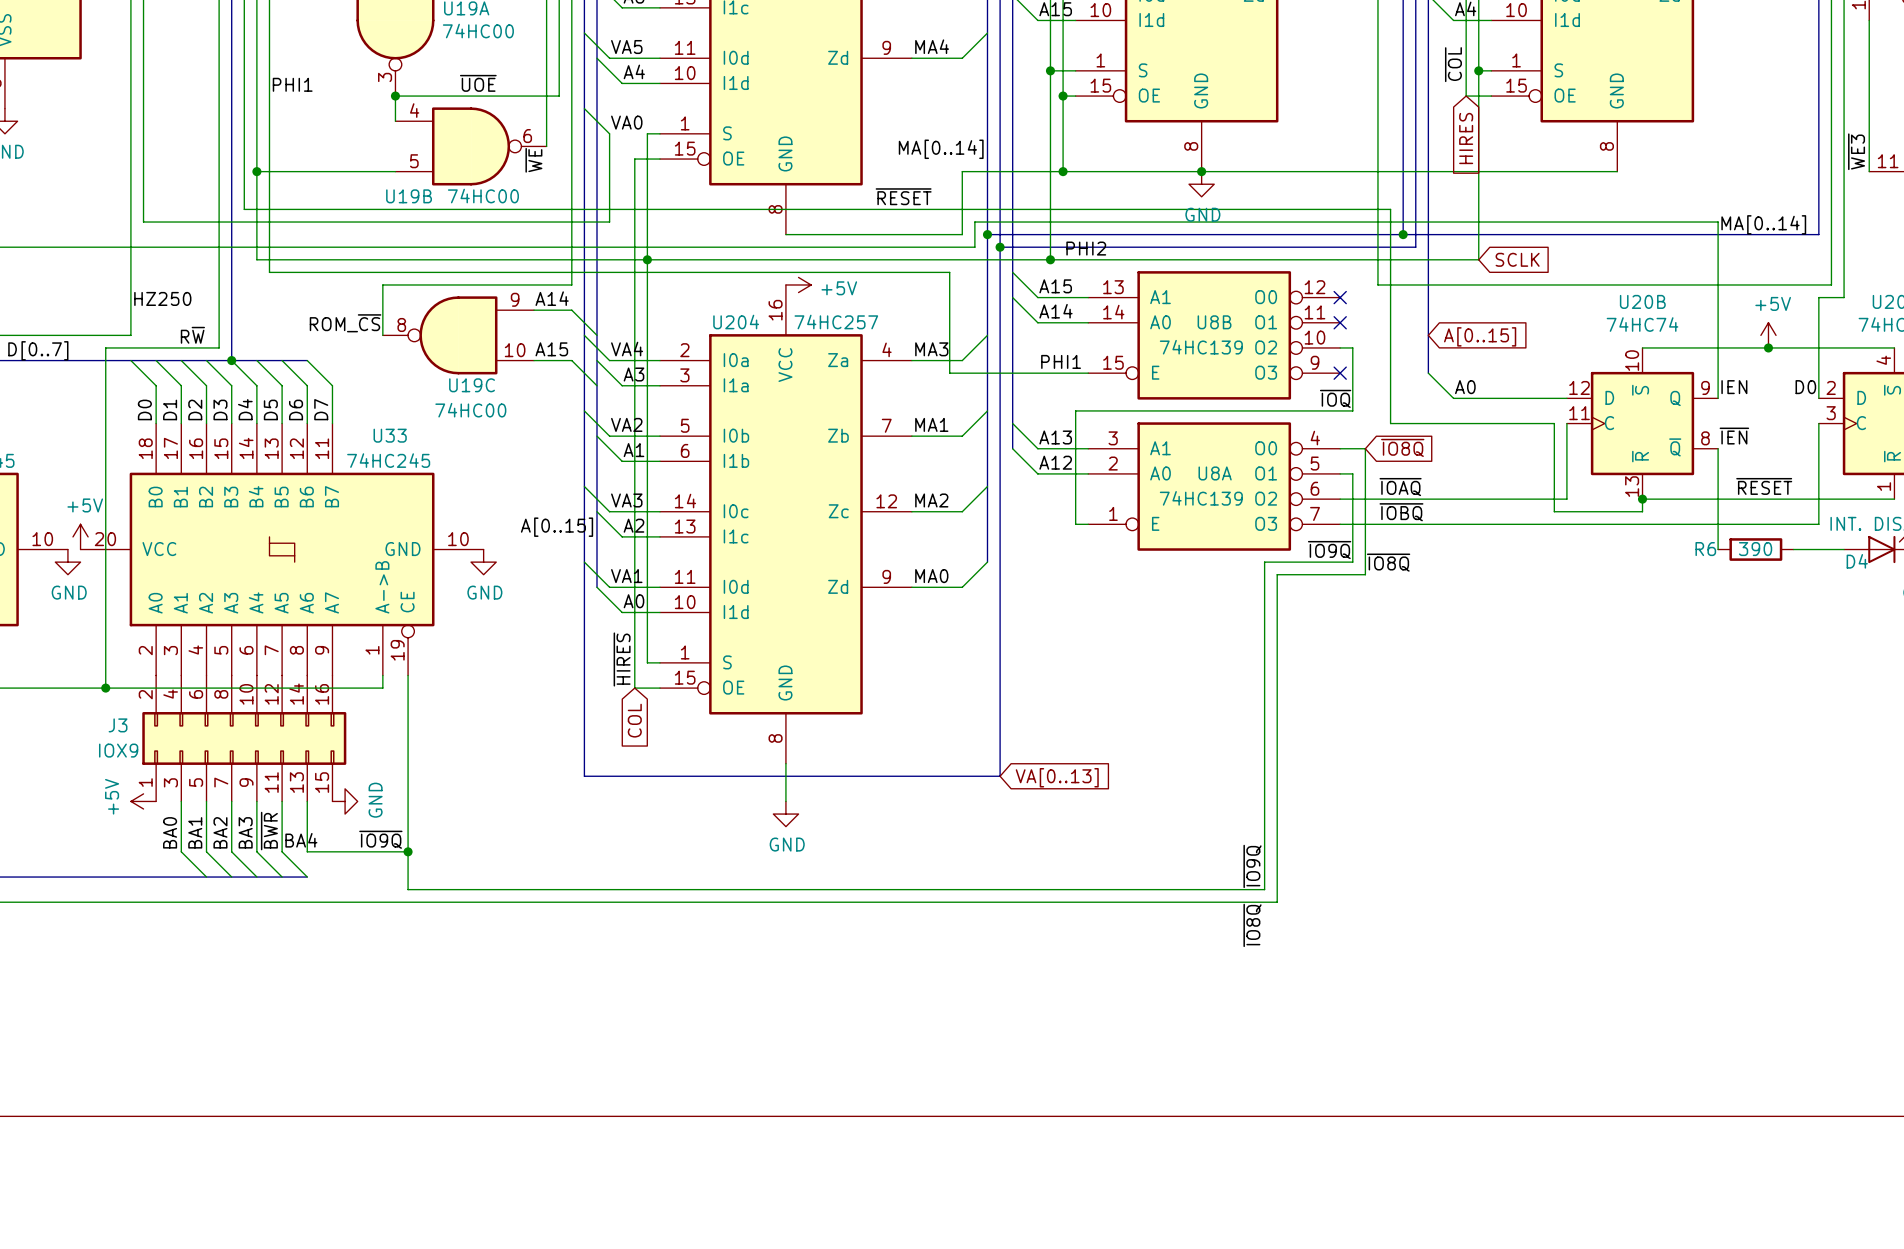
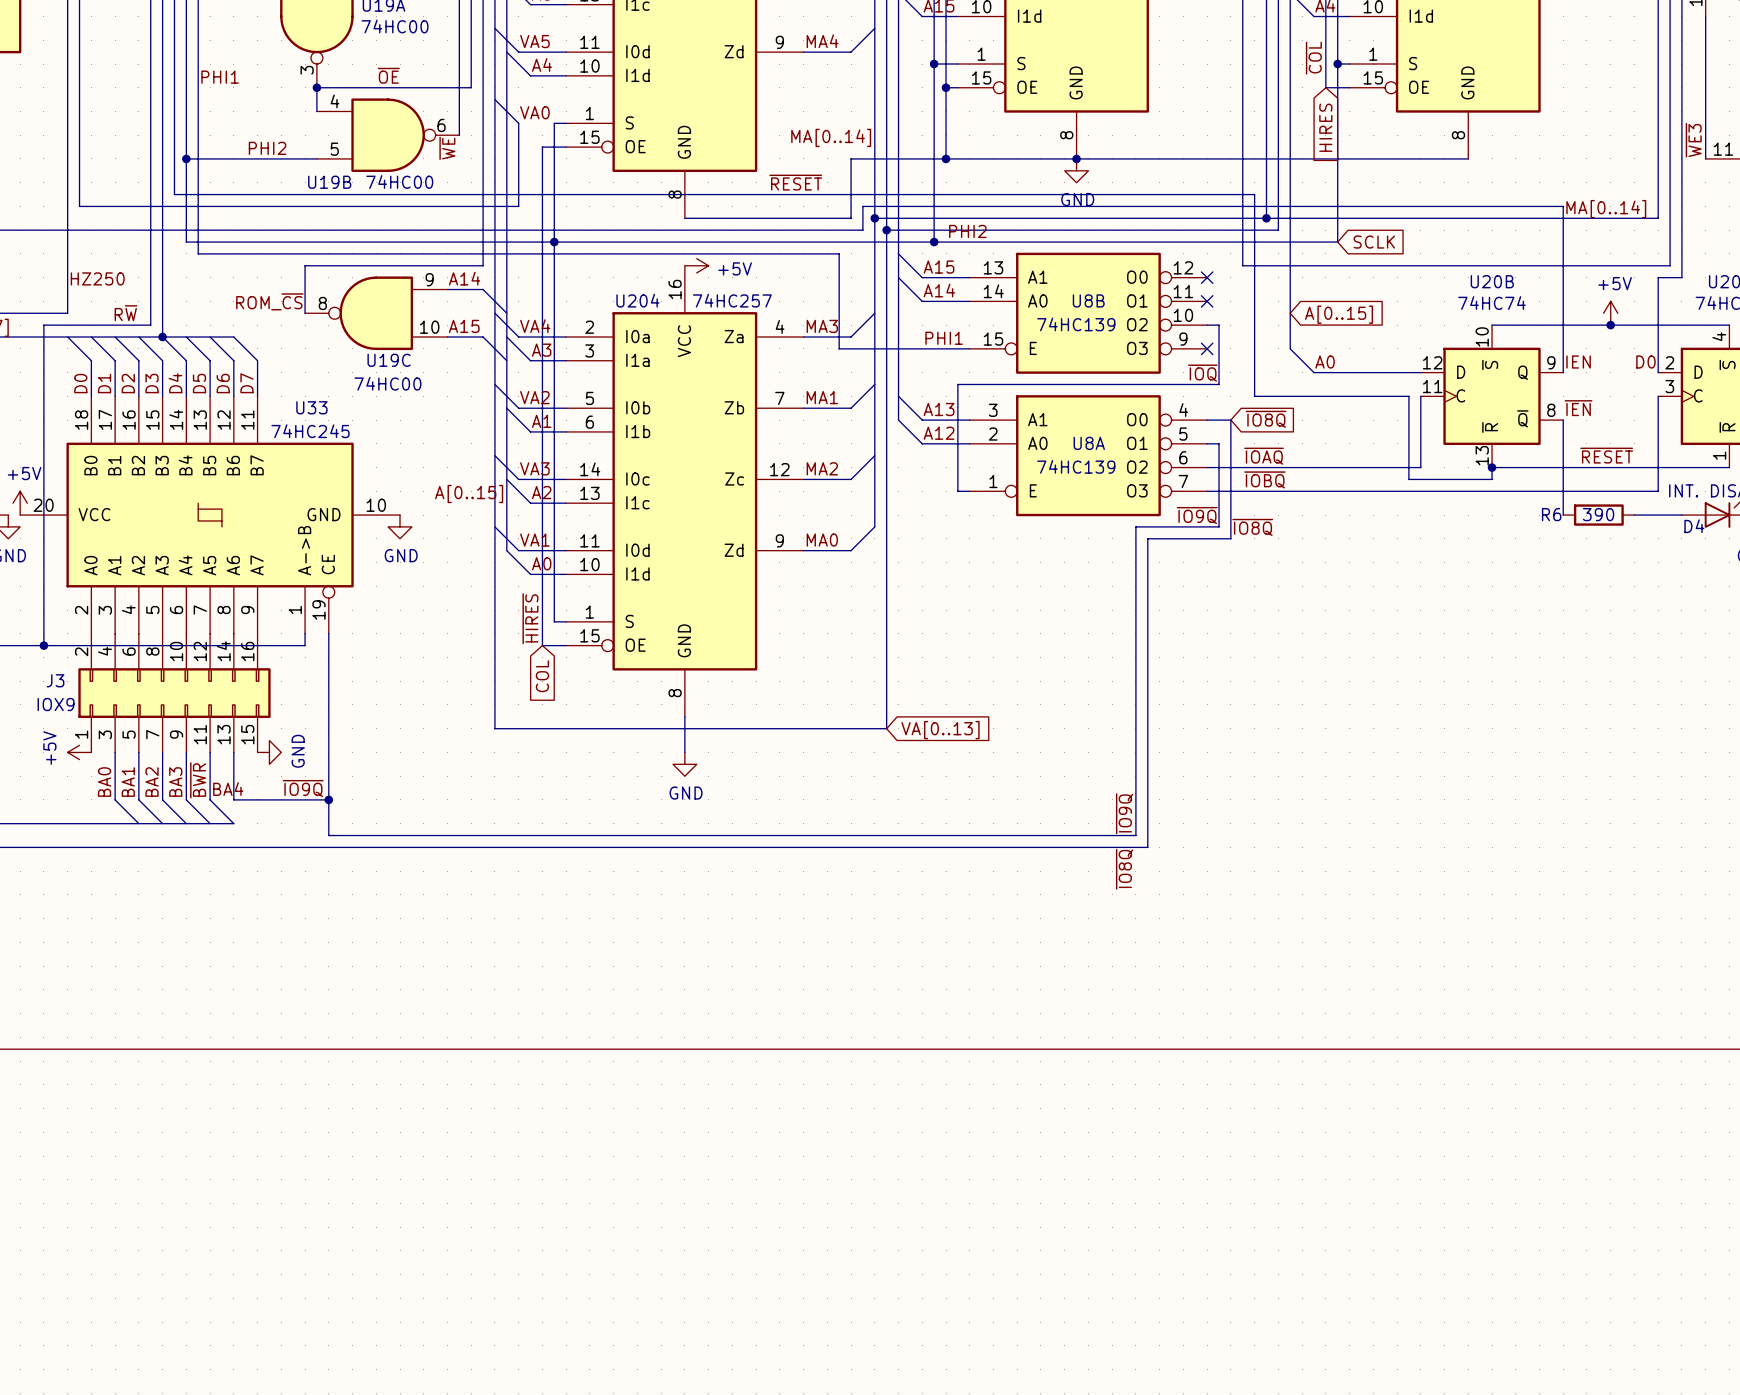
label: ~{UOE} (478, 83) -> ~{OE} (388, 75)
label: none -> PHI2 (267, 148)

